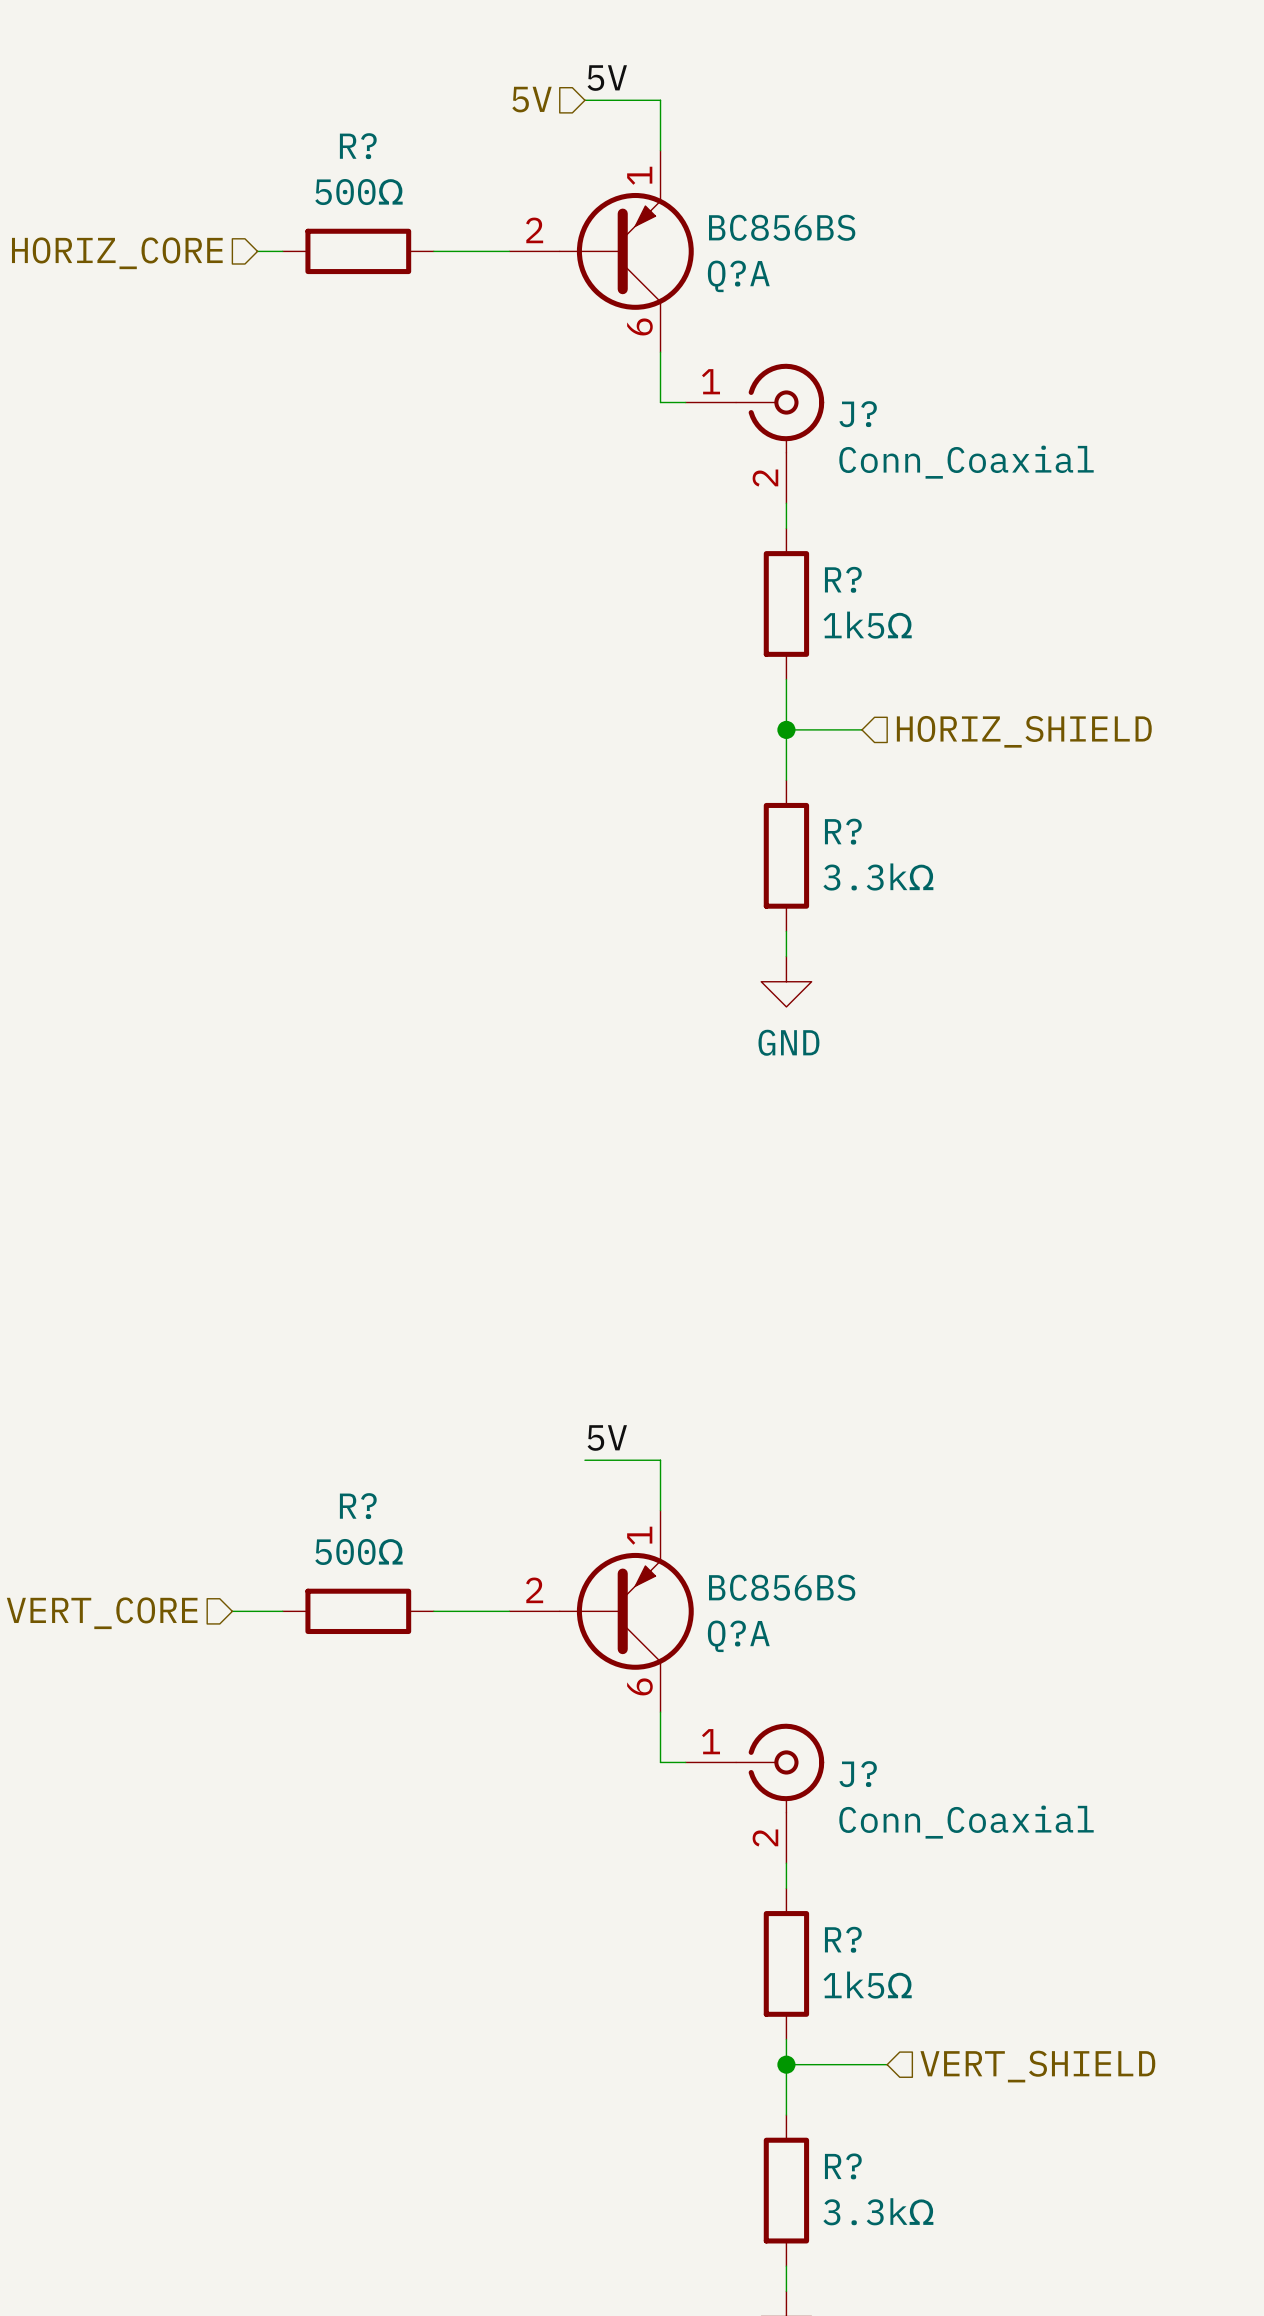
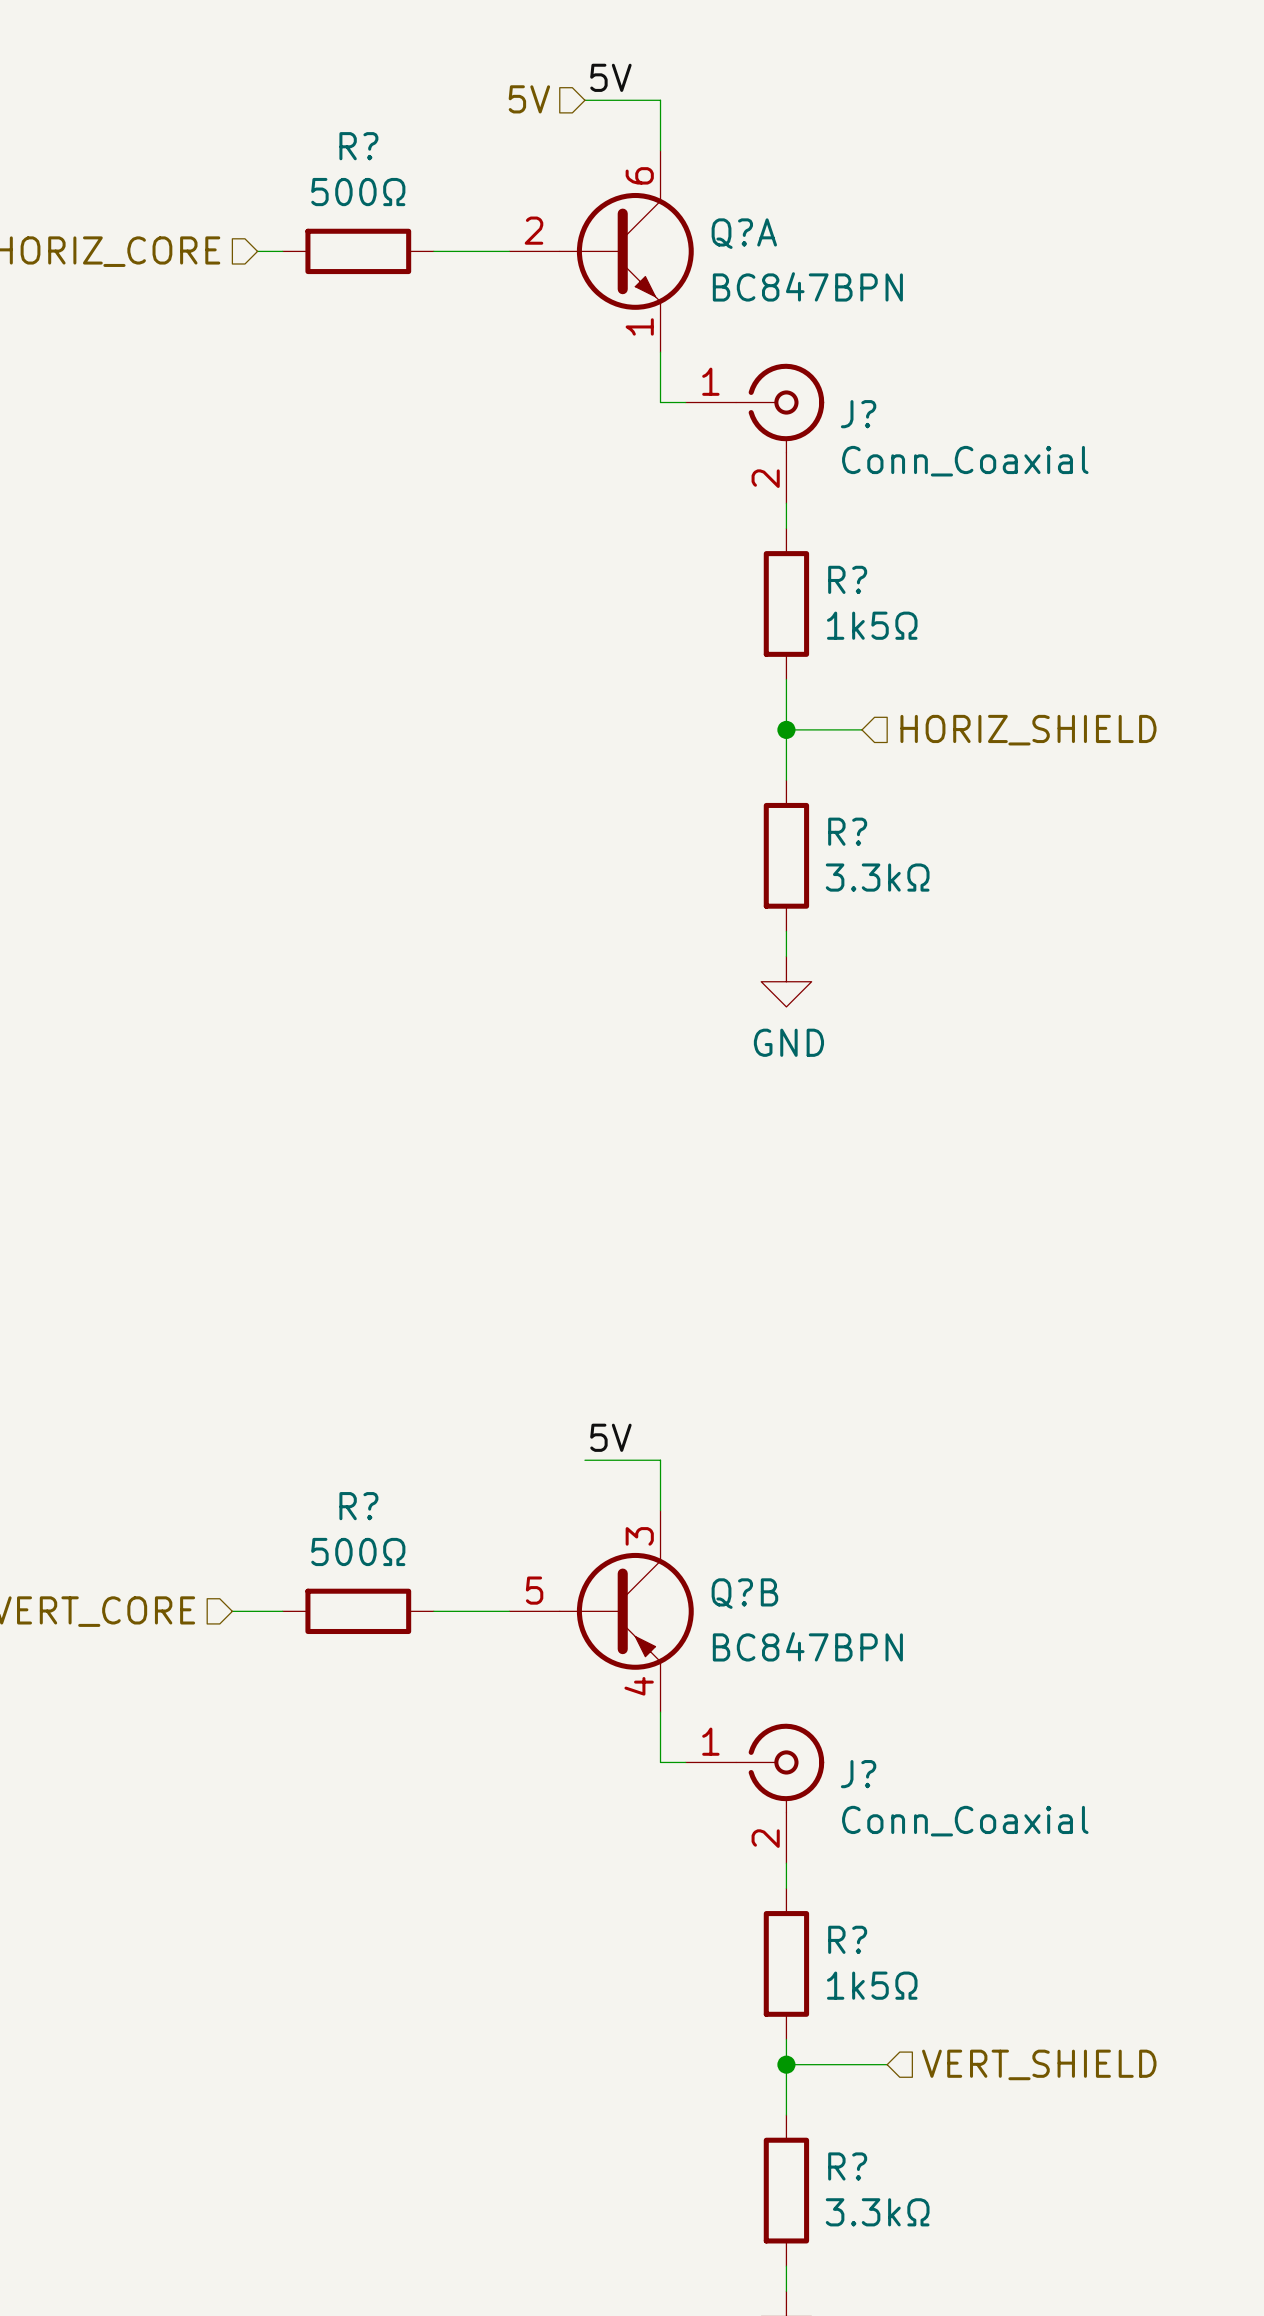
Q?A symbol: [509, 150, 694, 353] -> [509, 150, 694, 353]
Q?A value: BC856BS (782, 227) -> BC847BPN (807, 286)
Q?A name position: Q?A (738, 276) -> Q?A (744, 233)
Q?A: BC856BS (601, 1611) -> none
Q?B: none -> BC847BPN (601, 1611)

